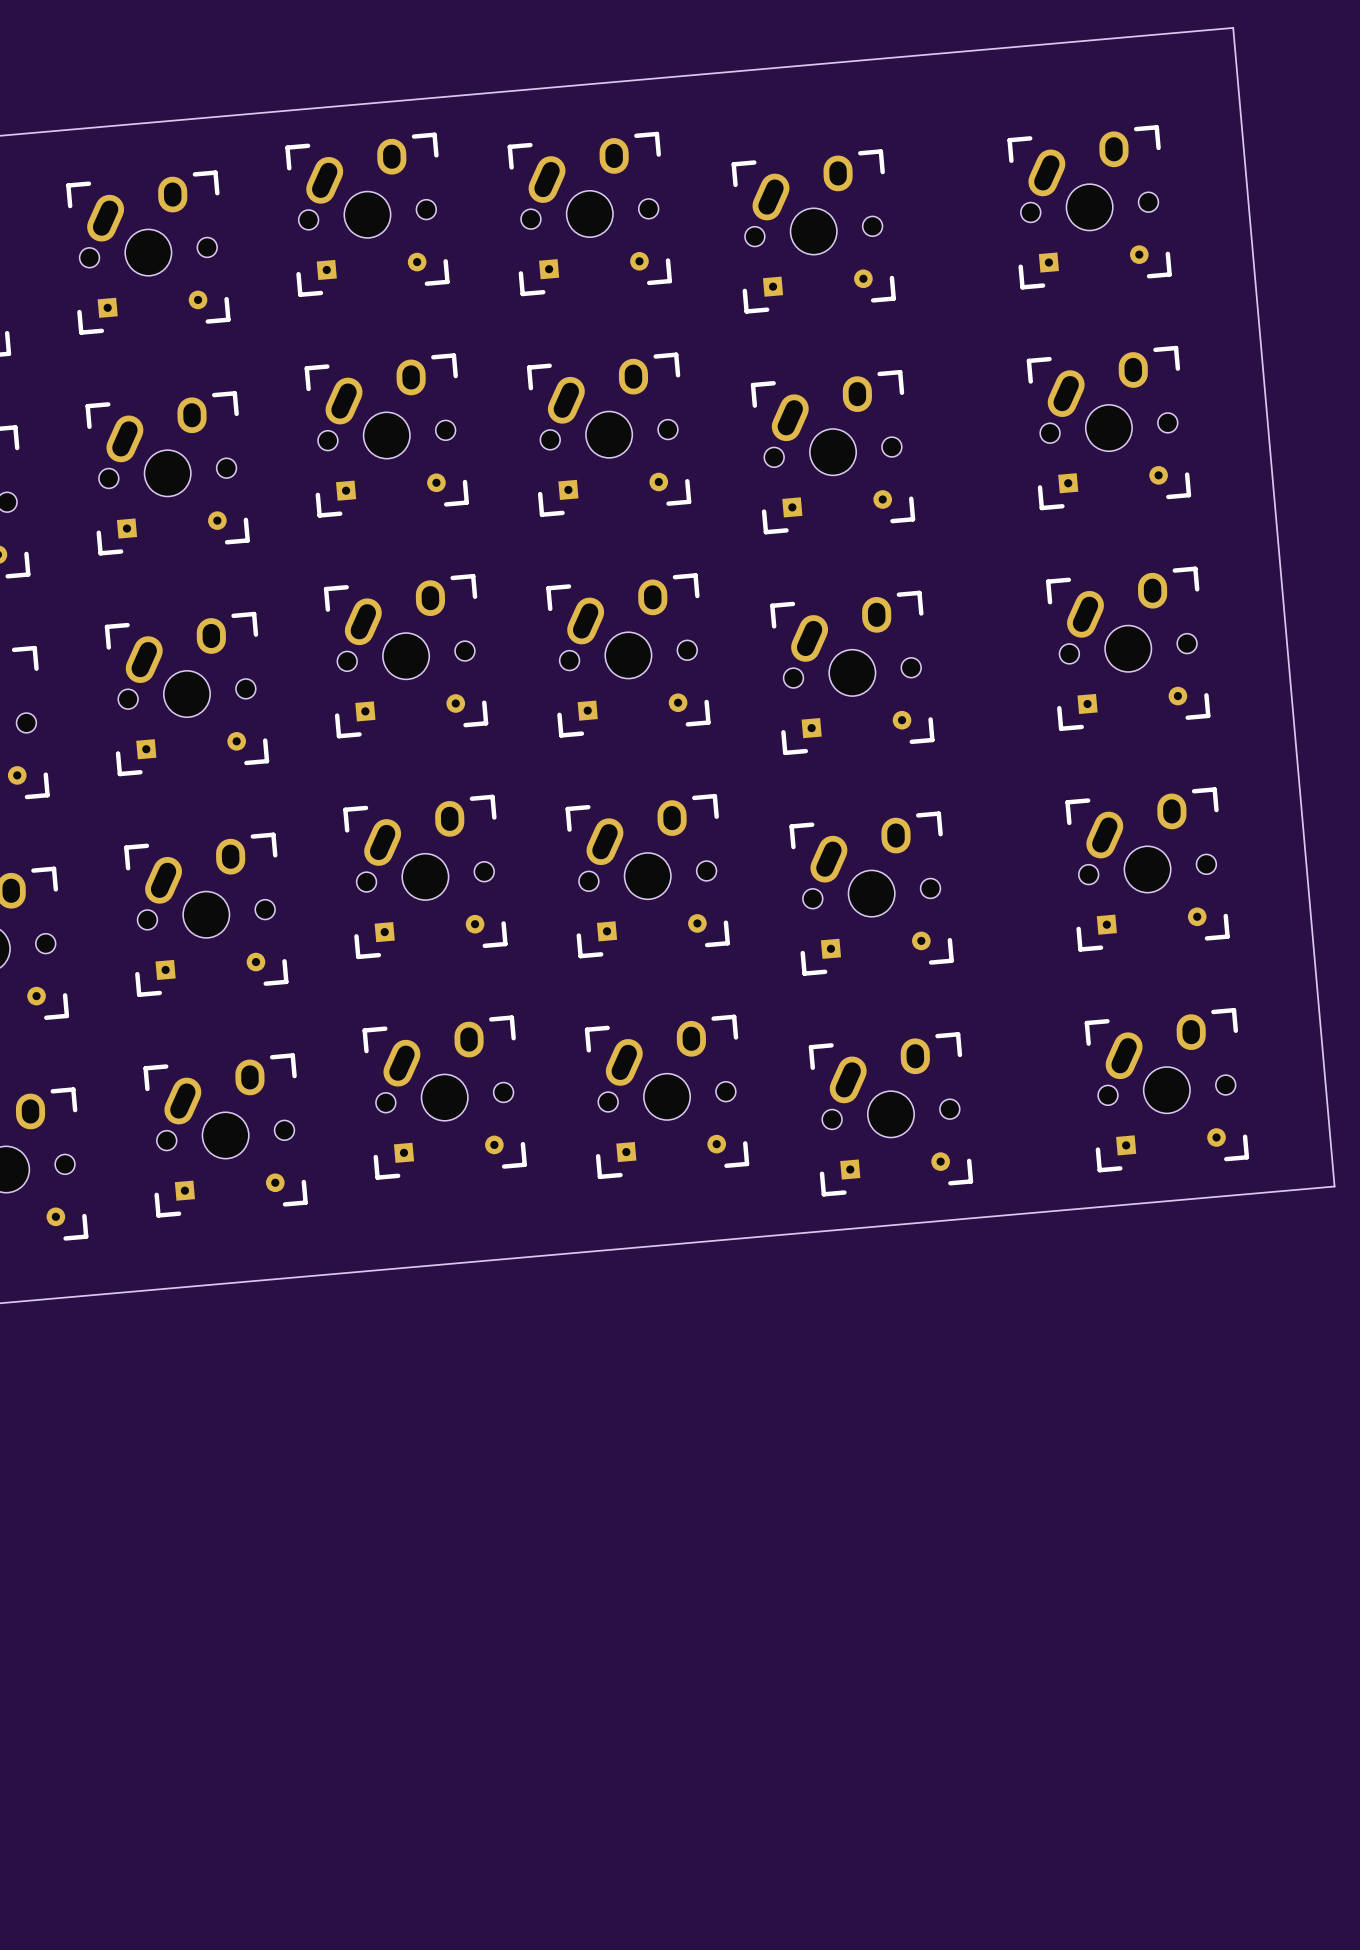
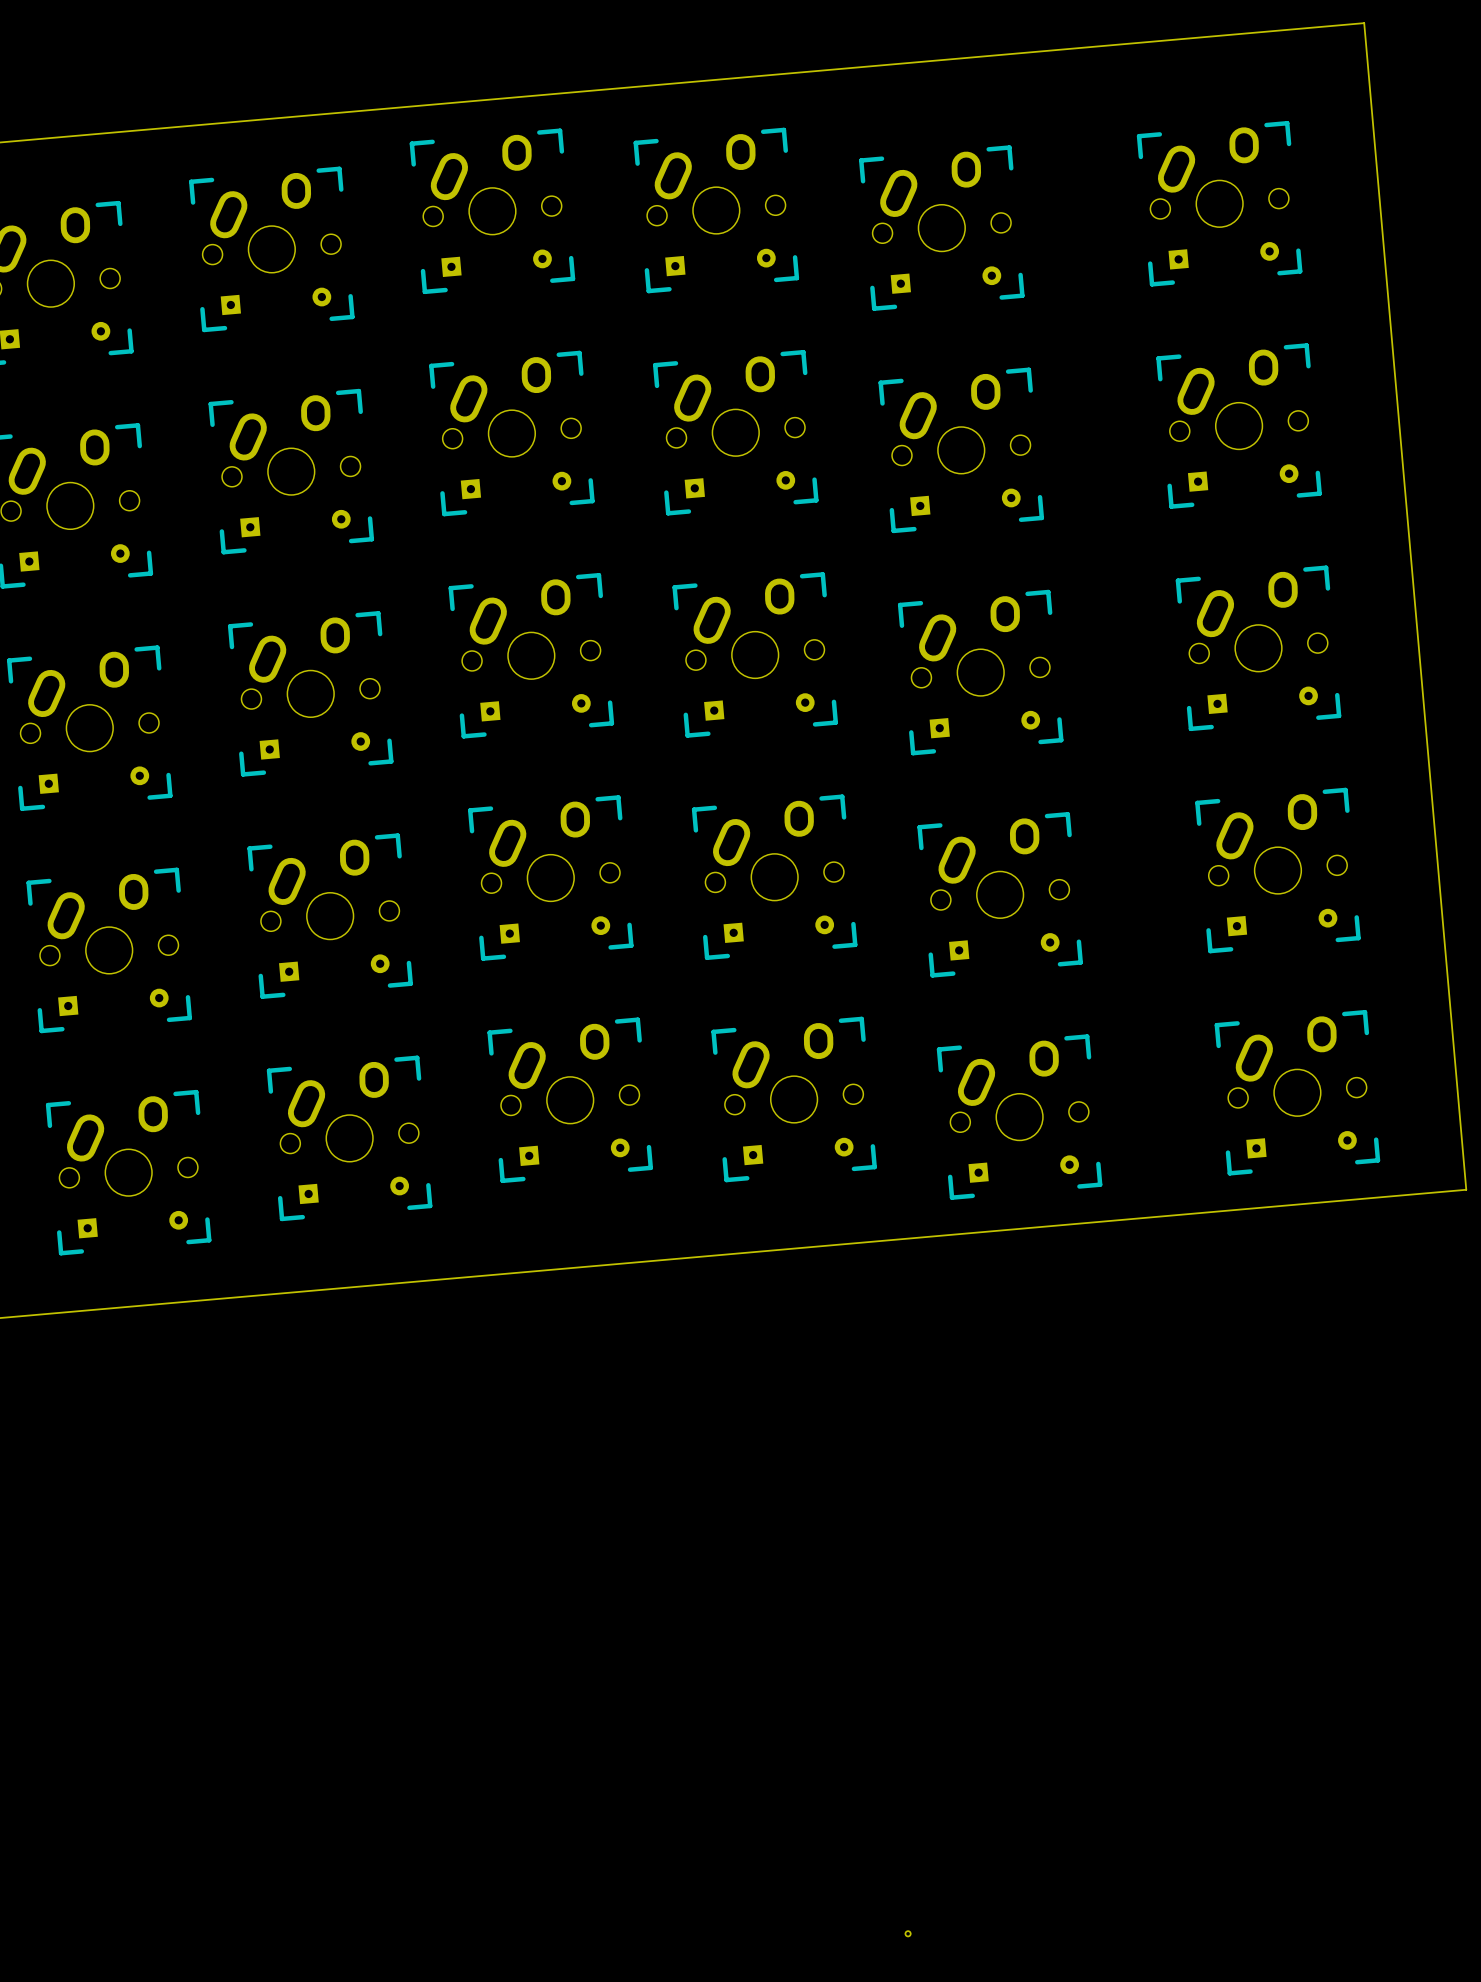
part: none -> (908, 1933)

